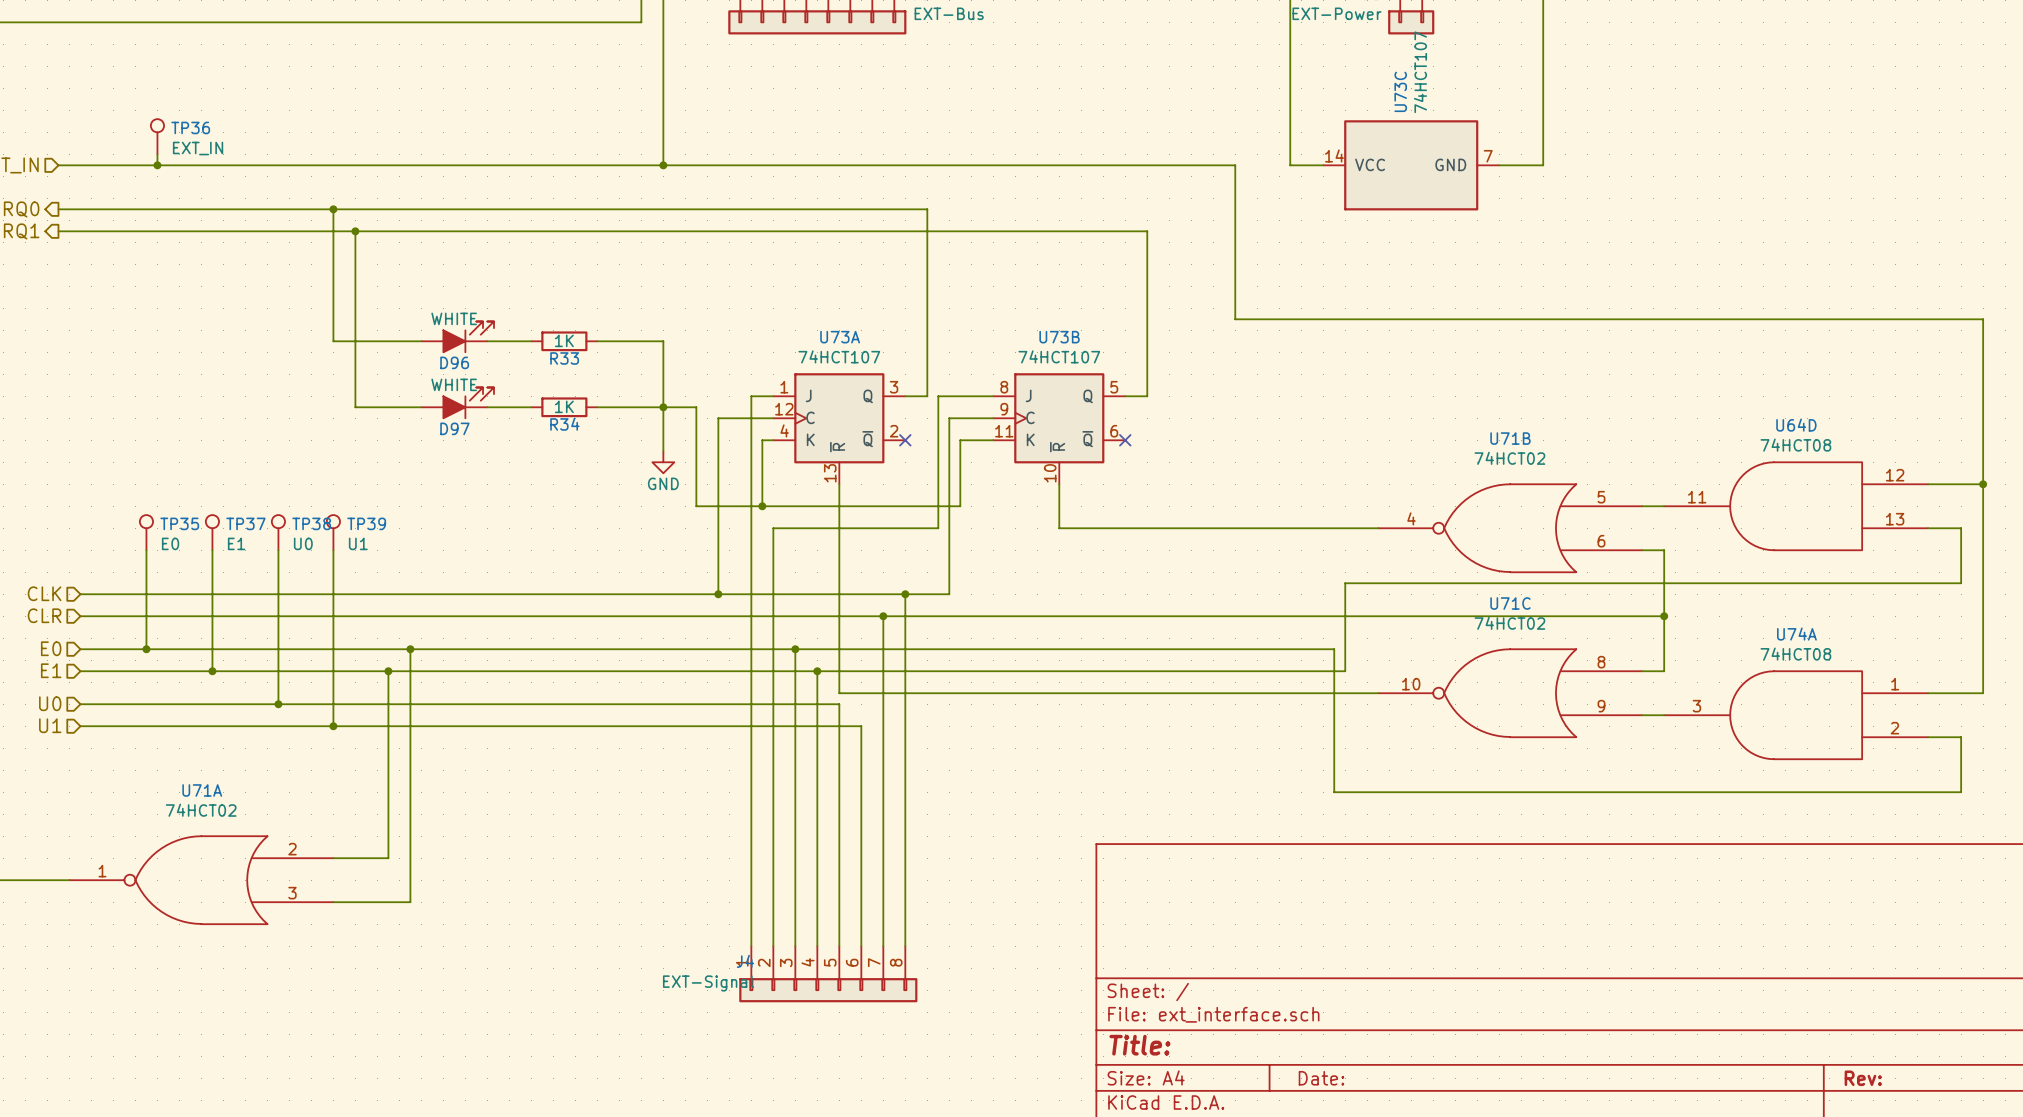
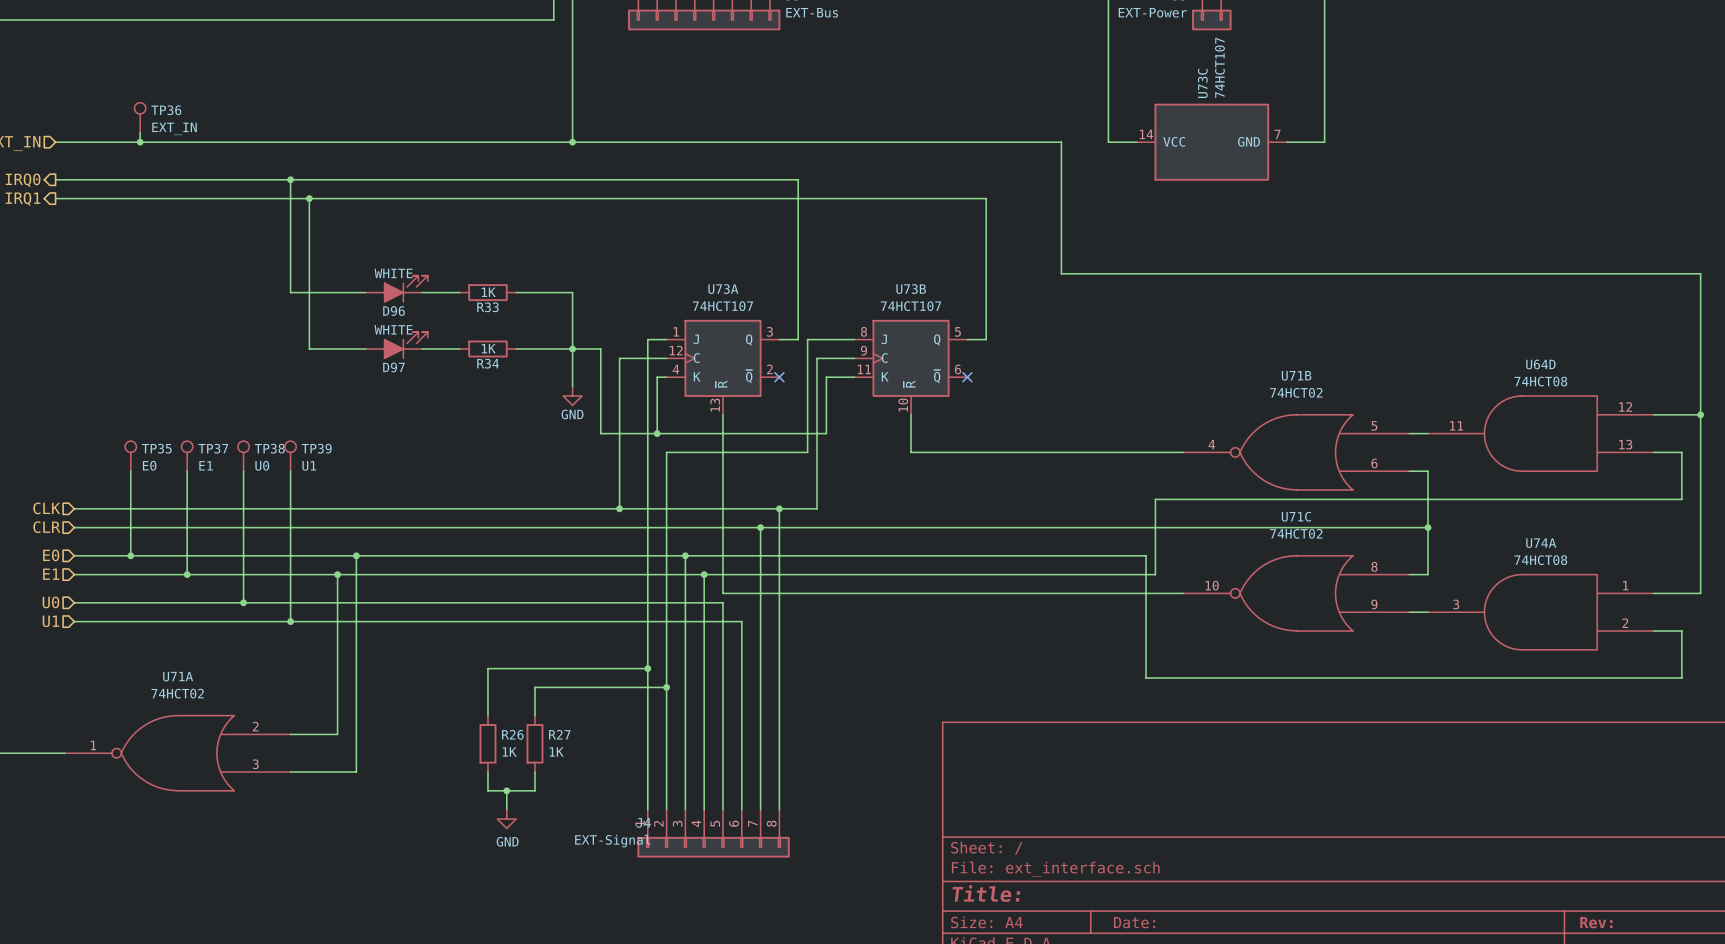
wire: none -> (647, 668) (487, 668) (487, 715)
junction: none -> (647, 668)
wire: none -> (666, 687) (534, 687) (534, 715)
junction: none -> (666, 687)
R26: none -> 1K (487, 743)
R27: none -> 1K (534, 743)
wire: none -> (487, 772) (487, 790) (534, 790) (534, 772)
wire: none -> (506, 790) (506, 809)
junction: none -> (506, 790)
power symbol: none -> GND (506, 819)

